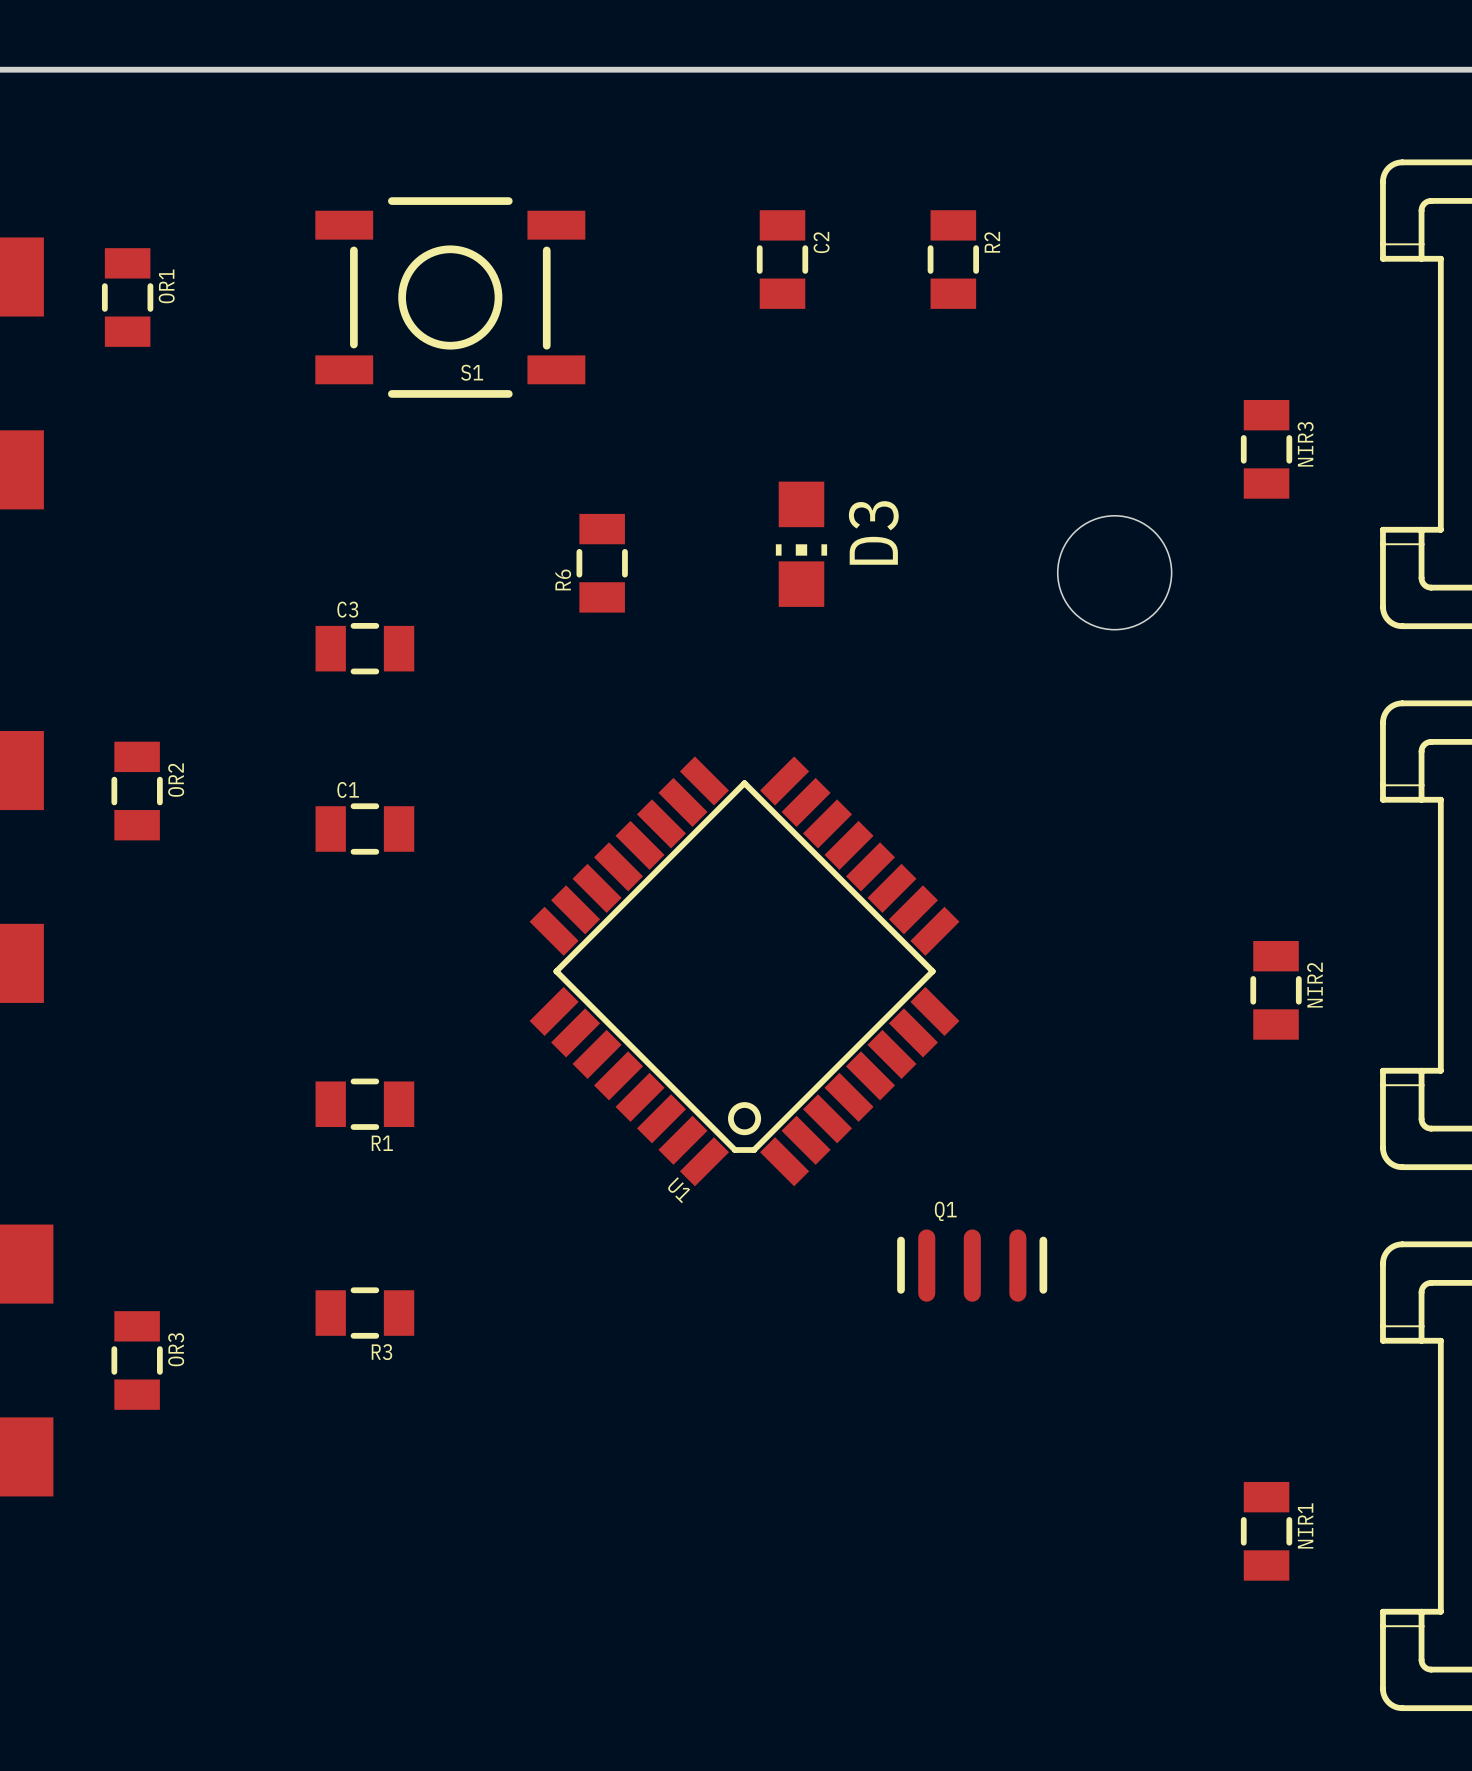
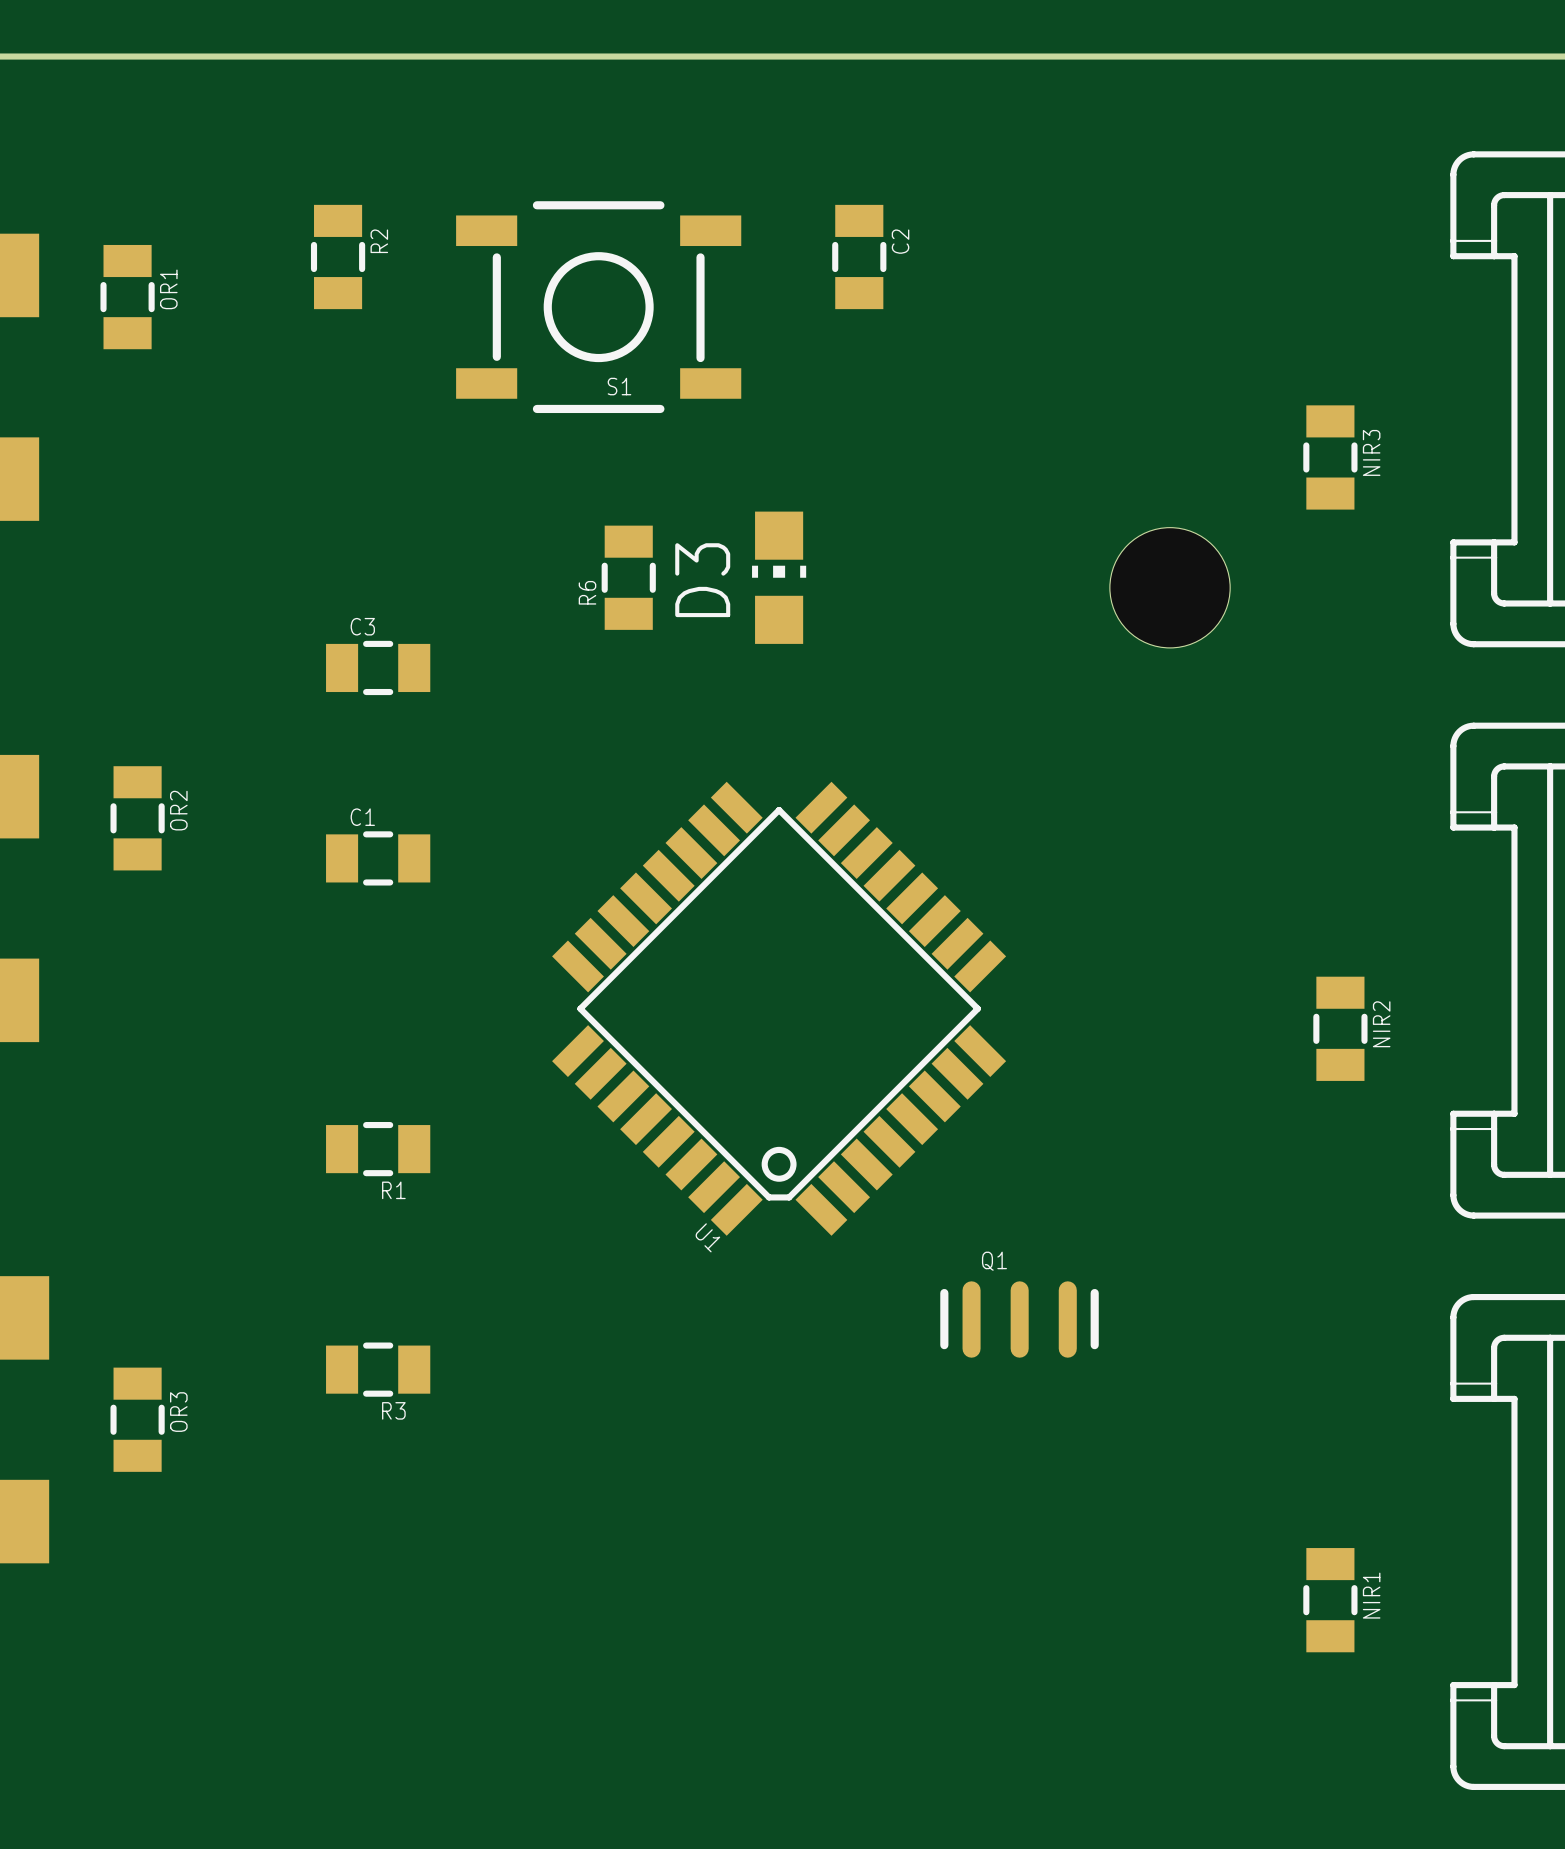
C2 position: (782, 259) -> (859, 257)
R2 position: (953, 259) -> (338, 257)
S1 position: (450, 297) -> (598, 307)
D3 rotation: 0° (801, 544) -> 180° (779, 577)

